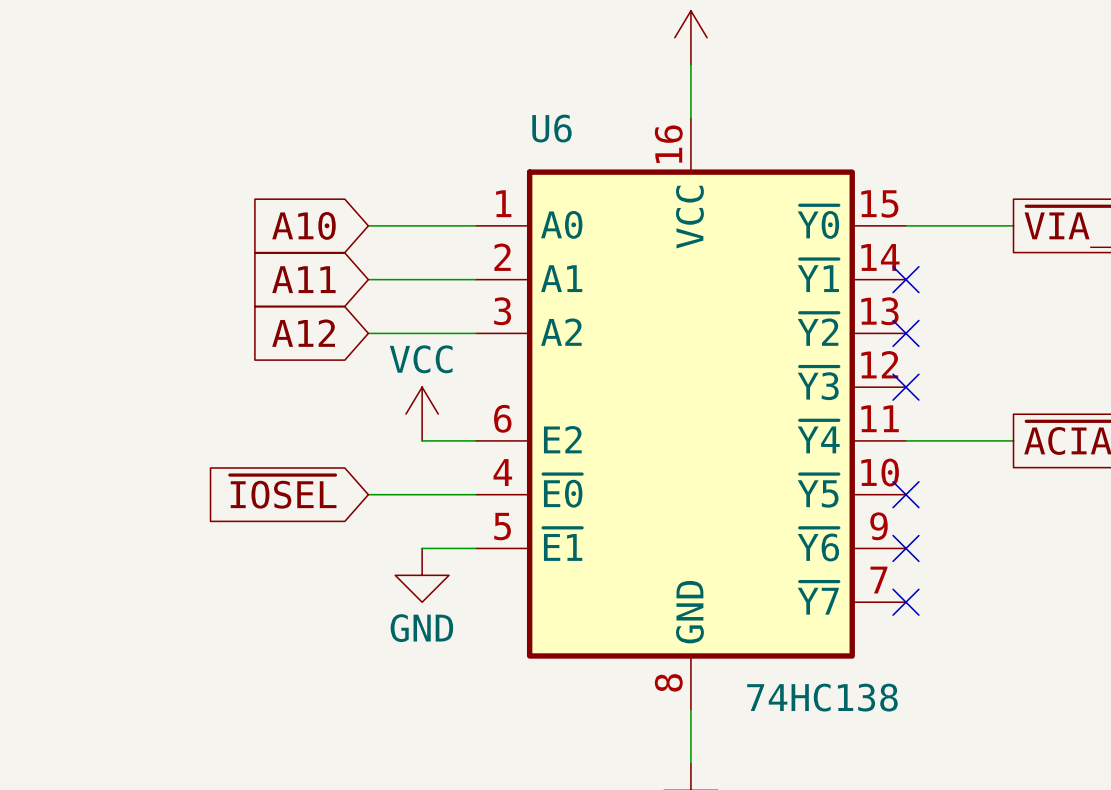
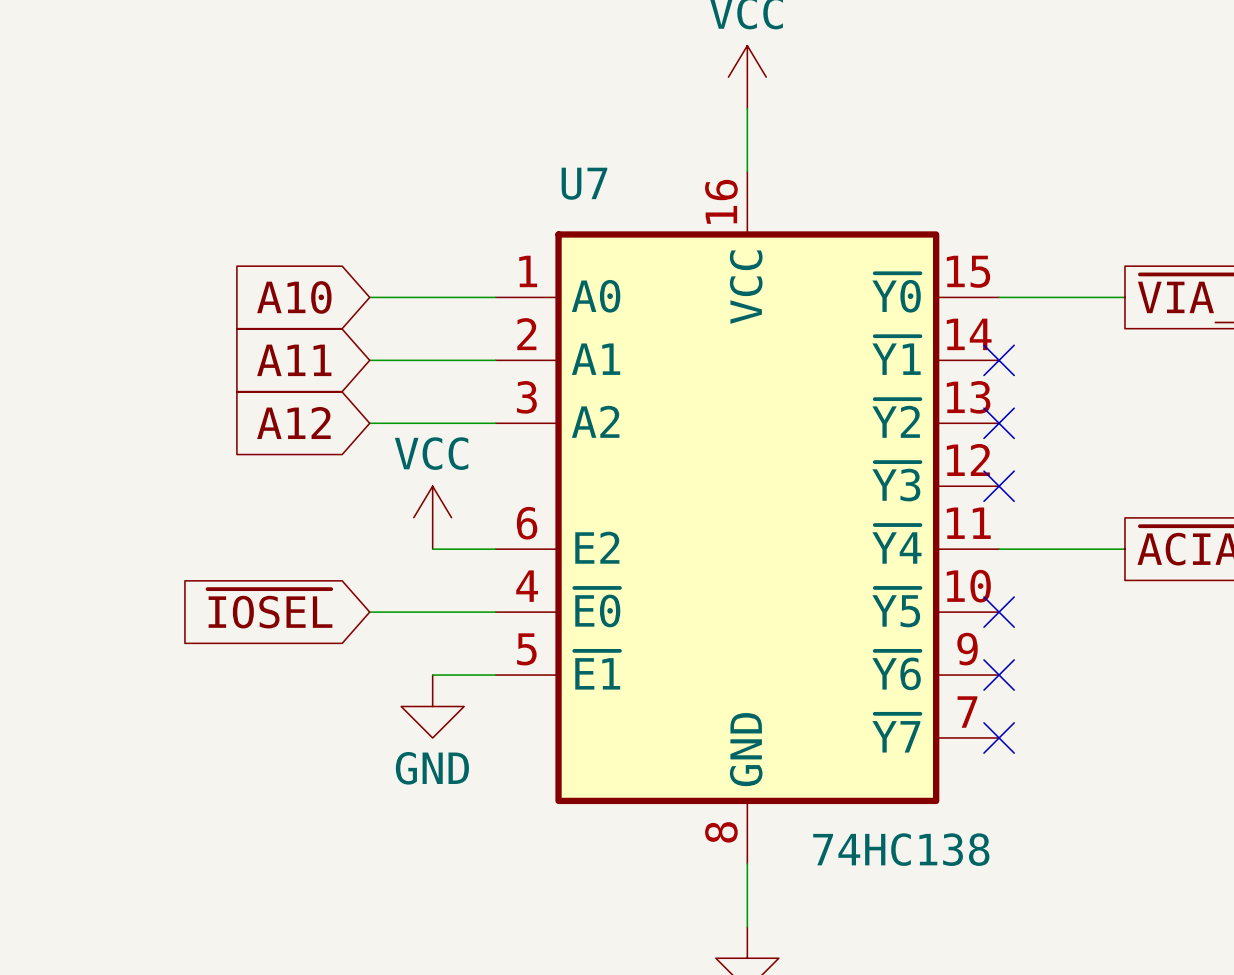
U6 name: U6 (551, 128) -> U7 (584, 183)

